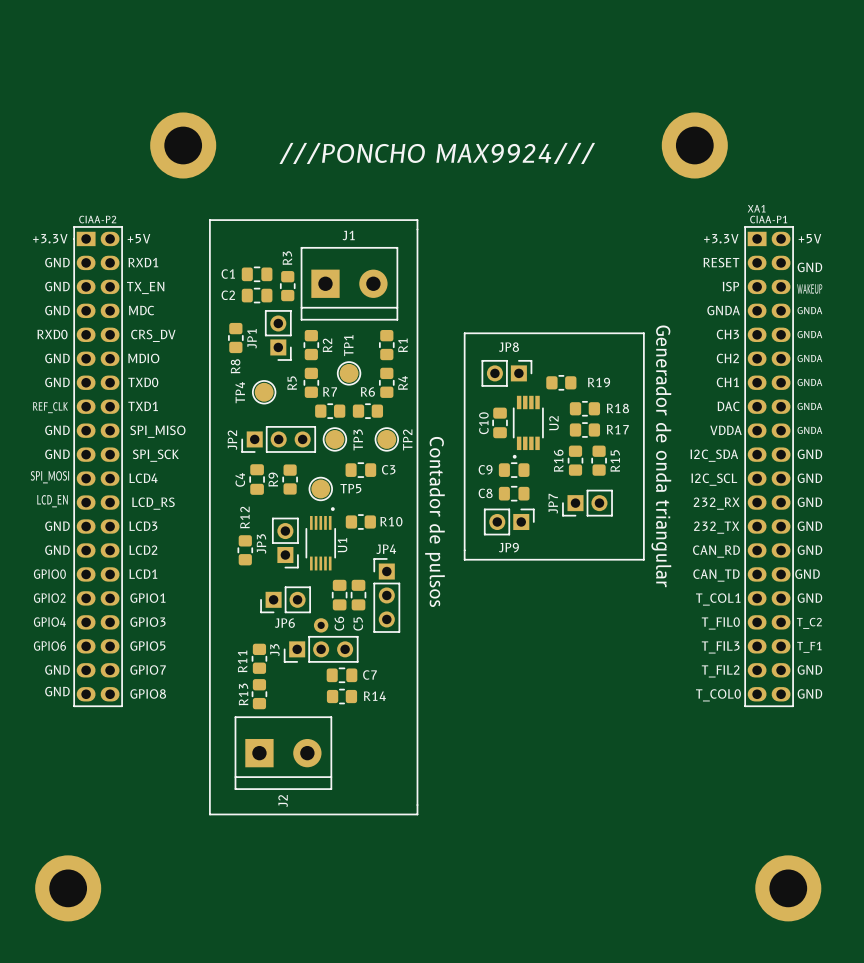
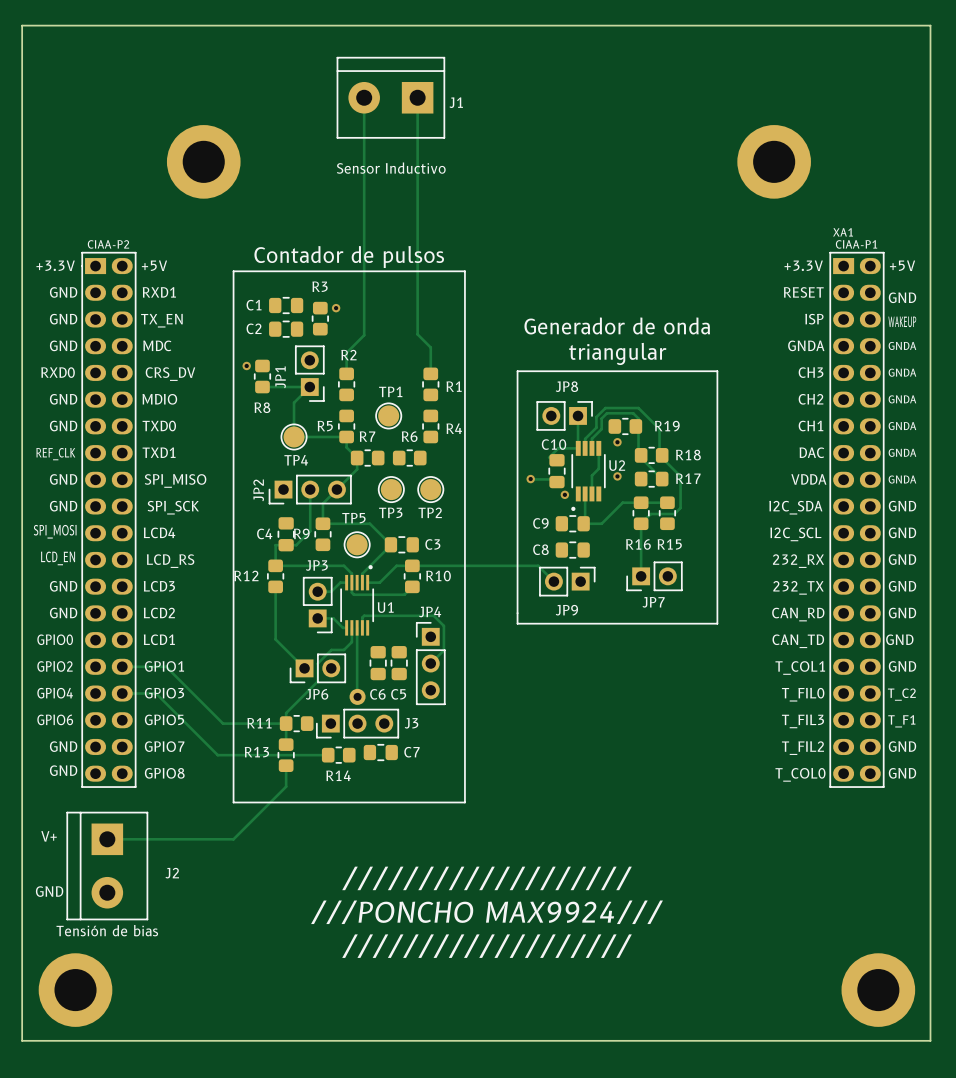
board edge: none -> (22, 25) (930, 25) (930, 1040) (22, 1040) (22, 25)
track: none -> (364, 97) (364, 335) (346, 352) (346, 373)
track: none -> (417, 97) (417, 334) (430, 347) (430, 373)
text: none -> Sensor Inductivo (391, 168)
text: ///PONCHO MAX9924/// (437, 153) -> none
text: none -> Contador de pulsos (349, 257)
J1 name position: J1 (348, 235) -> J1 (456, 102)
line: (209, 243) (209, 220) (417, 220) (417, 243) -> (233, 271) (464, 271)
R3 name rotation: 0° (287, 258) -> 90° clockwise (320, 286)
via: none -> (336, 308)
J1 rotation: 0° (349, 283) -> 180° (390, 97)
J1 position: (349, 283) -> (390, 97)
text: none -> triangular (617, 353)
via: none -> (246, 365)
R2 name rotation: 0° (327, 345) -> 90° clockwise (348, 355)
R2 name position: R2 (327, 345) -> R2 (348, 355)
TP1 name rotation: 0° (348, 345) -> 90° clockwise (390, 391)
R1 name rotation: 0° (402, 345) -> 90° clockwise (454, 386)
track: none -> (262, 387) (309, 387) (294, 402) (294, 436) (346, 436) (346, 447) (357, 458) (357, 469) (322, 503) (322, 523) (369, 523) (390, 544) (362, 573) (362, 582)
R8 name rotation: 0° (235, 366) -> 90° clockwise (262, 407)
track: none -> (578, 415) (578, 448) (558, 448) (549, 457)
R4 name rotation: 0° (402, 382) -> 90° clockwise (454, 428)
R5 name rotation: 0° (292, 383) -> 90° clockwise (325, 426)
TP4 name rotation: 0° (240, 392) -> 90° clockwise (296, 460)
TP4 name position: TP4 (240, 392) -> TP4 (296, 460)
via: none -> (617, 442)
track: none -> (585, 448) (585, 438) (596, 427) (596, 417) (605, 408) (638, 408) (659, 429) (659, 455) (680, 476) (680, 507) (674, 514) (650, 514) (641, 523) (641, 576)
track: none -> (591, 448) (591, 438) (601, 429) (601, 418) (606, 413) (633, 413) (638, 418) (638, 455) (659, 476)
track: none -> (598, 448) (598, 468) (591, 475) (591, 493)
C10 name rotation: 0° (483, 423) -> 90° clockwise (554, 444)
U2 name rotation: 0° (553, 423) -> 90° clockwise (617, 465)
via: none -> (617, 476)
track: none -> (530, 479) (549, 479)
via: none -> (530, 479)
track: none -> (310, 489) (310, 531) (296, 545) (275, 545) (275, 565) (343, 565) (351, 573) (351, 592) (353, 594) (404, 594) (412, 586)
TP3 position: (334, 439) -> (391, 489)
TP3 name rotation: 0° (358, 439) -> 90° clockwise (390, 512)
TP2 name rotation: 0° (407, 439) -> 90° clockwise (430, 512)
track: none -> (585, 493) (583, 523) (601, 523) (622, 502) (667, 502)
via: none -> (564, 494)
text: Generador de onda triangular (661, 456) -> Generador de onda (617, 325)
R16 name rotation: 0° (558, 460) -> 90° clockwise (638, 544)
R15 name rotation: 0° (615, 460) -> 90° clockwise (669, 544)
C3 position: (360, 470) -> (401, 544)
C4 name rotation: 0° (240, 479) -> 90° clockwise (264, 533)
R9 name rotation: 0° (273, 479) -> 90° clockwise (301, 533)
TP5 name position: TP5 (350, 488) -> TP5 (353, 518)
JP7 name rotation: 0° (553, 503) -> 90° clockwise (653, 602)
JP7 name position: JP7 (553, 503) -> JP7 (653, 602)
JP7 position: (587, 503) -> (654, 576)
R12 name rotation: 0° (244, 517) -> 90° clockwise (246, 575)
R10 rotation: 0° (360, 521) -> 90° clockwise (412, 576)
text: Contador de pulsos (435, 521) -> none
track: none -> (553, 581) (538, 565) (396, 565) (379, 582) (367, 582)
track: none -> (346, 582) (340, 582) (331, 591) (317, 591)
track: none -> (275, 586) (275, 639) (304, 668)
JP3 name rotation: 0° (261, 543) -> 90° clockwise (316, 565)
JP3 name position: JP3 (261, 543) -> JP3 (316, 565)
U1 name rotation: 0° (342, 545) -> 90° clockwise (385, 607)
R12 position: (245, 550) -> (275, 576)
track: none -> (317, 618) (333, 618) (342, 627) (346, 627)
track: none -> (351, 627) (351, 642) (343, 649) (331, 649) (317, 663) (317, 681) (286, 713) (286, 744)
track: none -> (357, 627) (357, 696)
track: none -> (362, 627) (364, 615) (433, 615) (443, 625) (443, 650) (430, 663)
track: none -> (122, 666) (166, 666) (223, 723) (286, 723)
track: none -> (122, 693) (156, 693) (217, 755) (328, 755)
C6 name rotation: 0° (339, 623) -> 90° clockwise (377, 694)
C5 name rotation: 0° (358, 623) -> 90° clockwise (398, 694)
J3 name rotation: 0° (274, 650) -> 90° clockwise (411, 723)
J3 name position: J3 (274, 650) -> J3 (411, 723)
R11 rotation: 0° (259, 658) -> 90° clockwise (296, 723)
track: none -> (286, 765) (286, 786) (233, 839) (107, 839)
R13 name rotation: 0° (243, 694) -> 90° clockwise (256, 752)
R13 position: (259, 694) -> (286, 755)
R14 position: (342, 696) -> (338, 755)
R14 name position: R14 (374, 696) -> R14 (338, 775)
line: (209, 720) (209, 814) (417, 814) (417, 720) -> (233, 802) (464, 802)
text: none -> V+ (49, 836)
J2 rotation: 0° (283, 753) -> 90° clockwise (107, 866)
J2 position: (283, 753) -> (107, 866)
text: none -> /////////////////// (487, 878)
text: none -> GND (49, 891)
J2 name position: J2 (283, 801) -> J2 (172, 873)
text: none -> ///PONCHO MAX9924/// (487, 912)
text: none -> Tensión de bias (107, 930)
text: none -> /////////////////// (487, 946)

